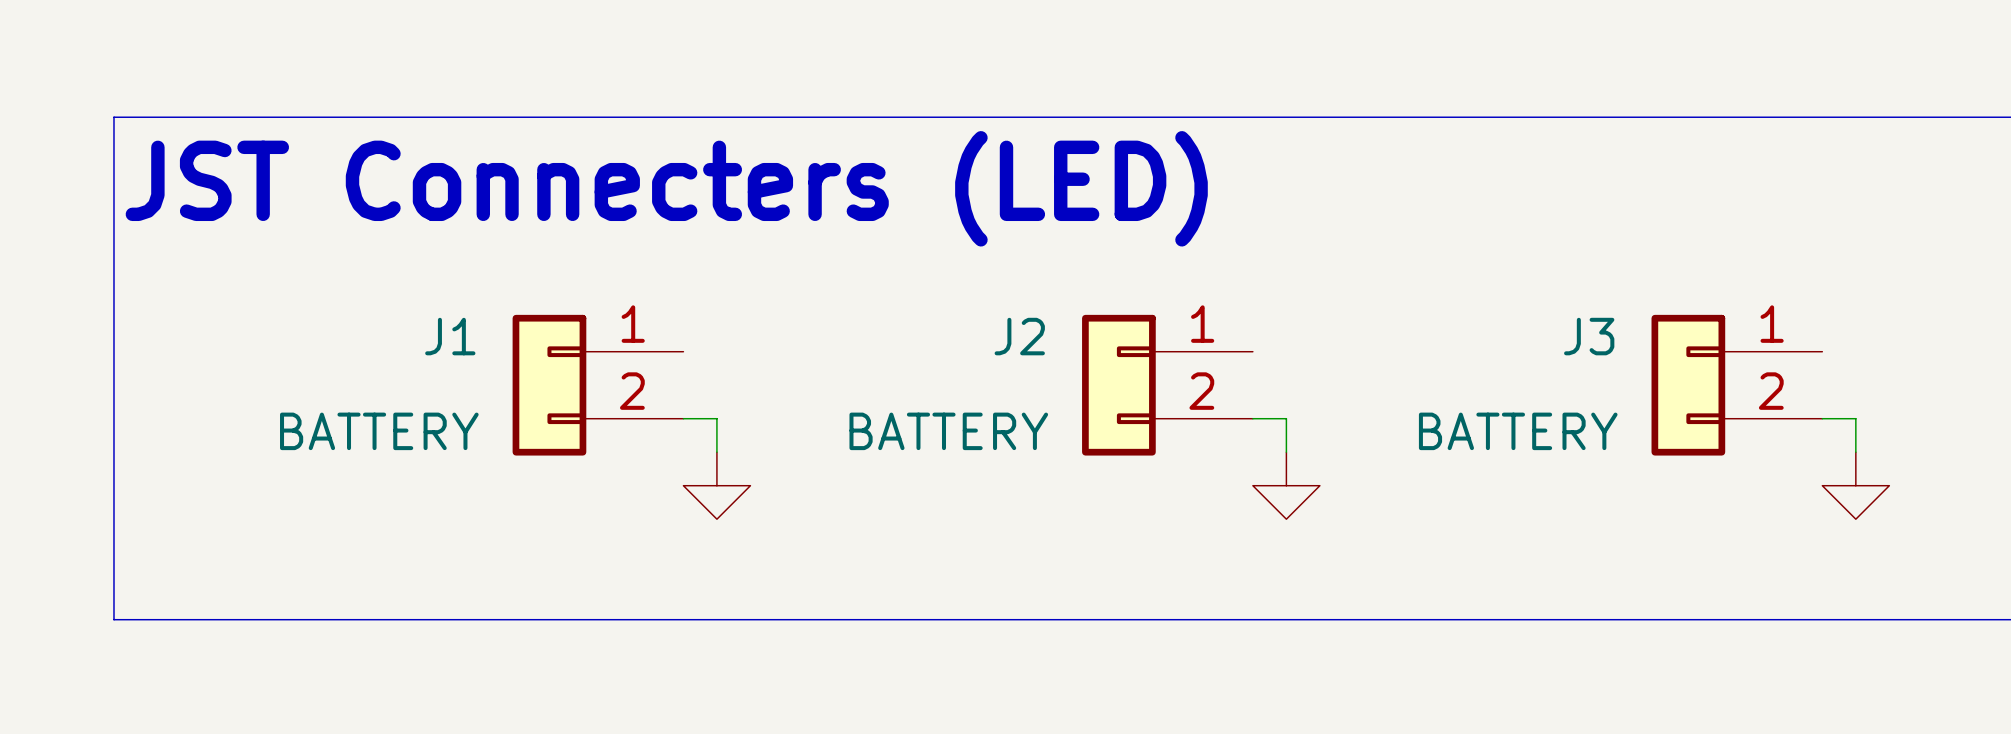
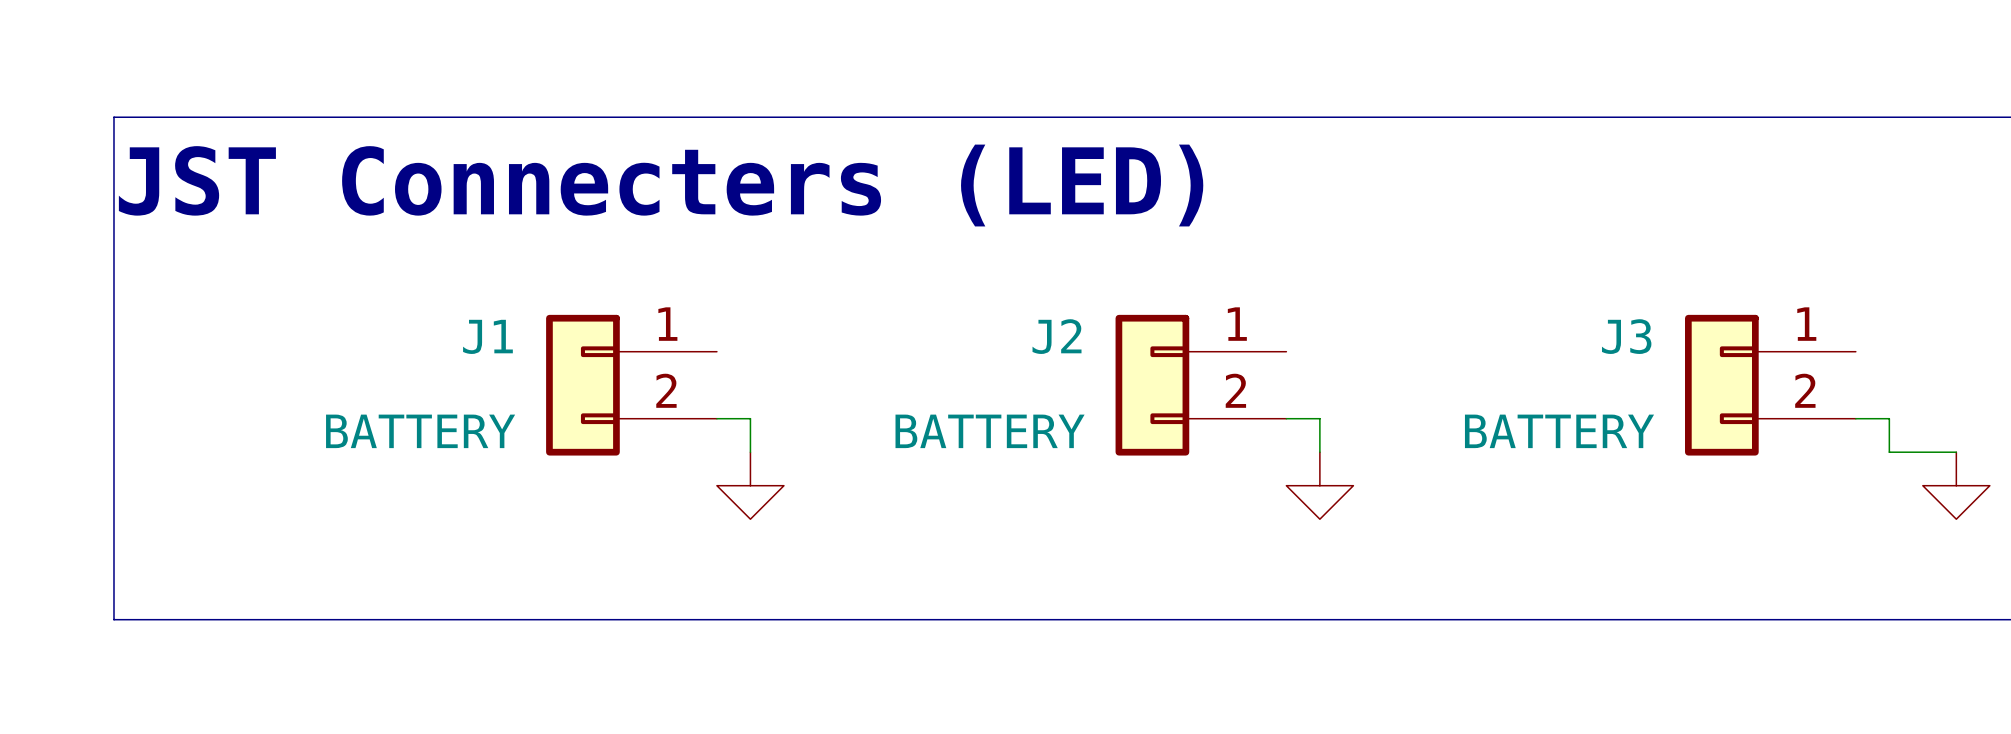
J1 position: (598, 385) -> (631, 385)
J2 position: (1167, 385) -> (1200, 385)
J3 position: (1736, 385) -> (1770, 385)
wire: (683, 418) (716, 418) (716, 452) -> (716, 418) (750, 418) (750, 452)
wire: (1252, 418) (1286, 418) (1286, 452) -> (1286, 418) (1319, 418) (1319, 452)
wire: (1822, 418) (1855, 418) (1855, 452) -> none
wire: none -> (1855, 418) (1889, 418) (1889, 452) (1956, 452)
power symbol position: (716, 485) -> (750, 485)
power symbol position: (1286, 485) -> (1319, 485)
power symbol position: (1855, 485) -> (1956, 485)

